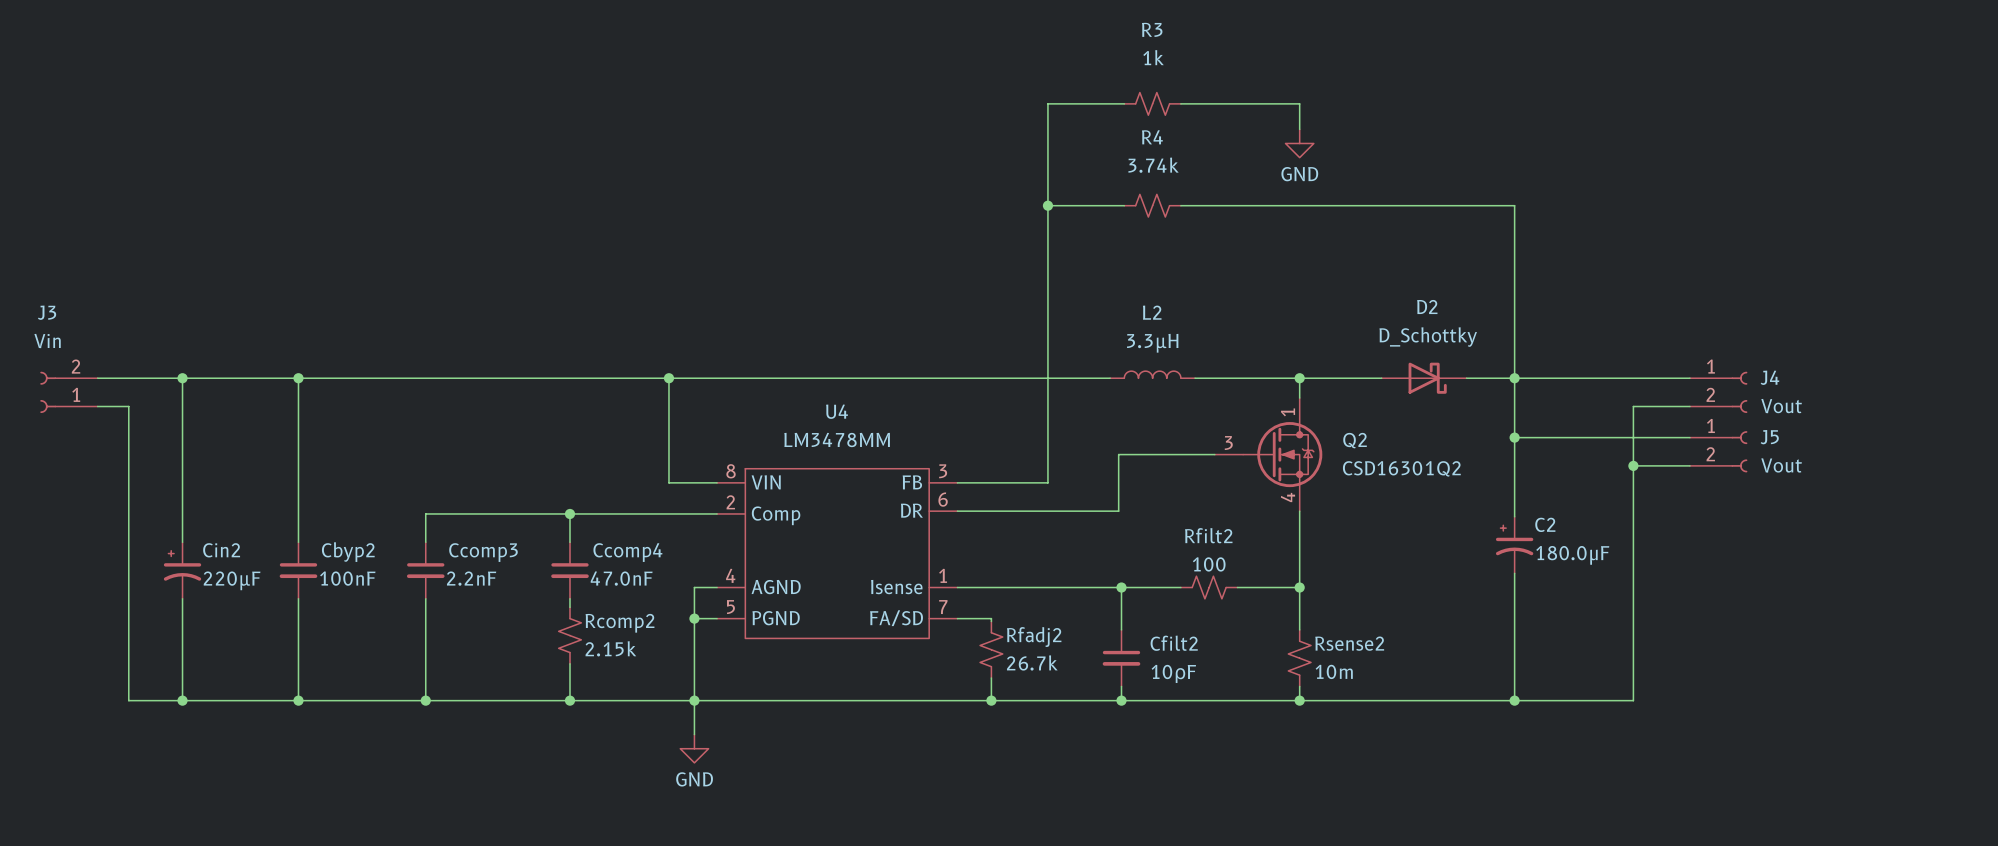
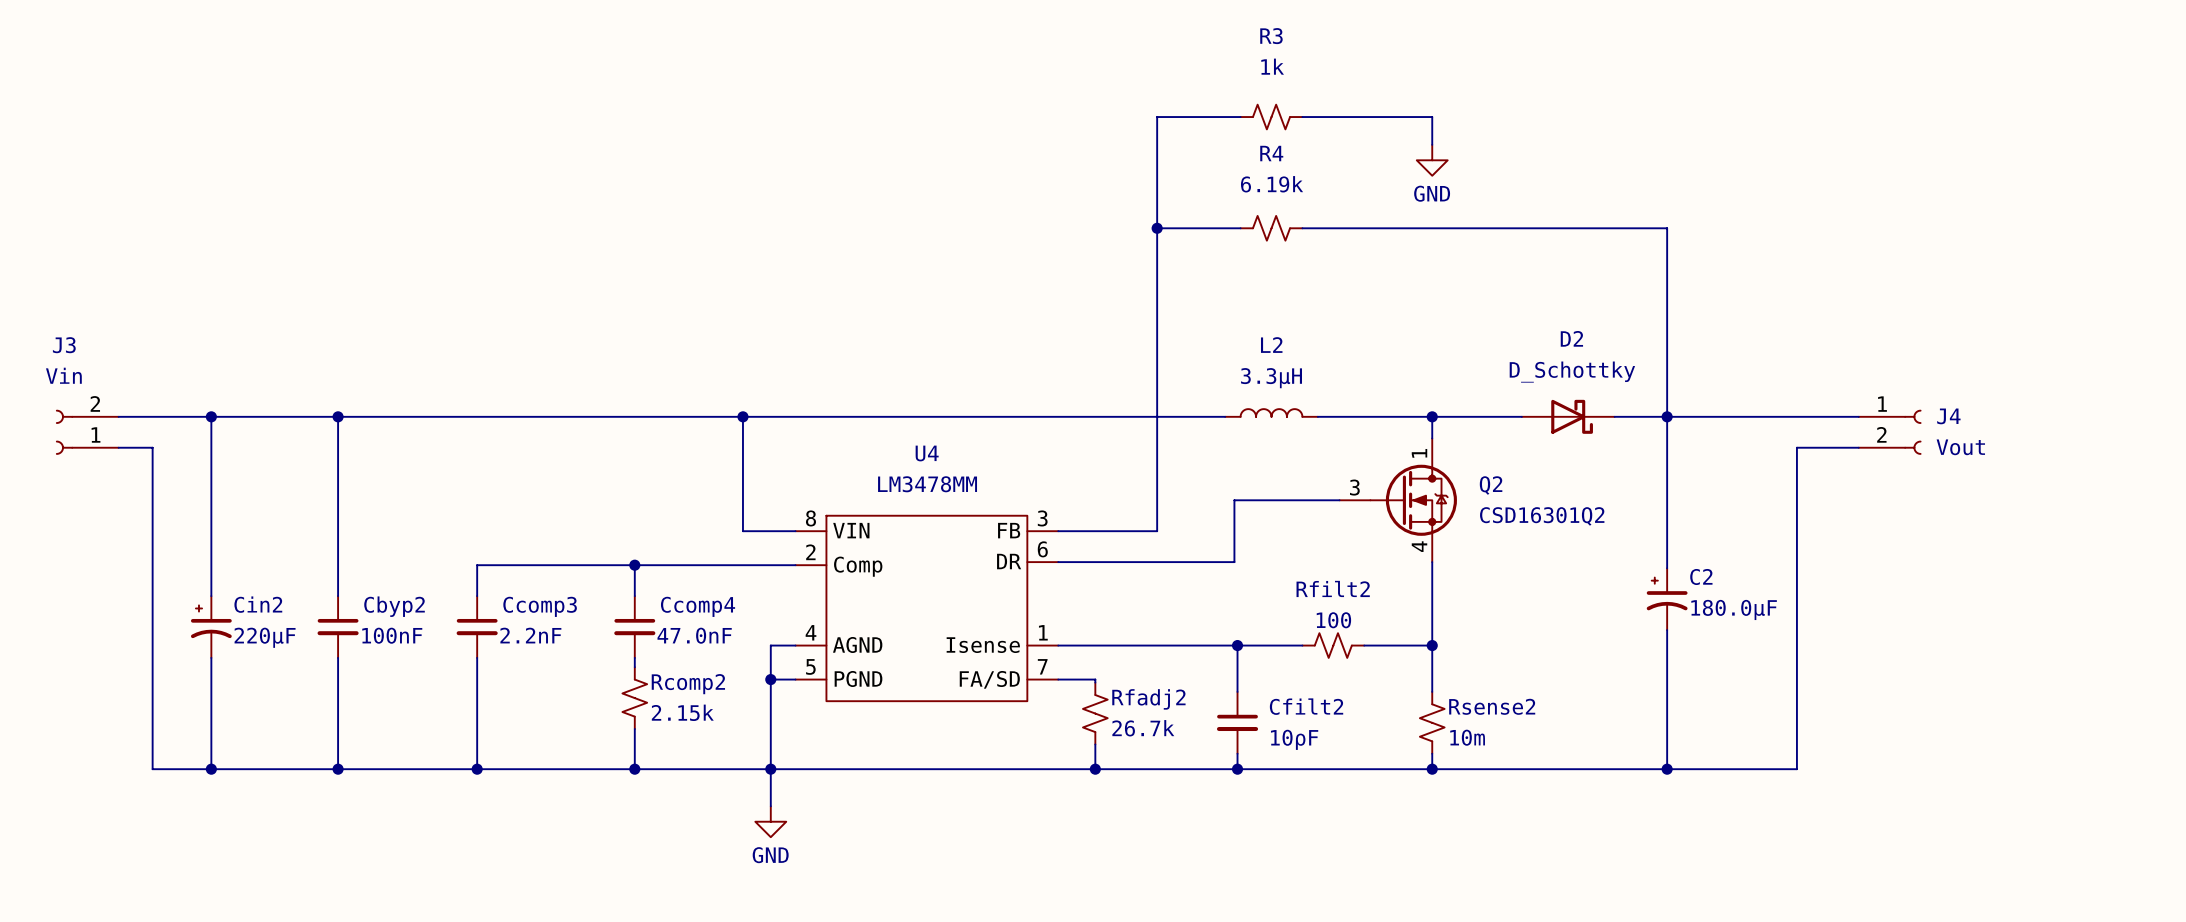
R4 value: 3.74k (1153, 165) -> 6.19k (1272, 184)
wire: (1514, 437) (1689, 437) -> none
junction: (1514, 437) -> none
J5: Vout (1718, 451) -> none
wire: (1633, 465) (1689, 465) -> none
junction: (1633, 465) -> none

